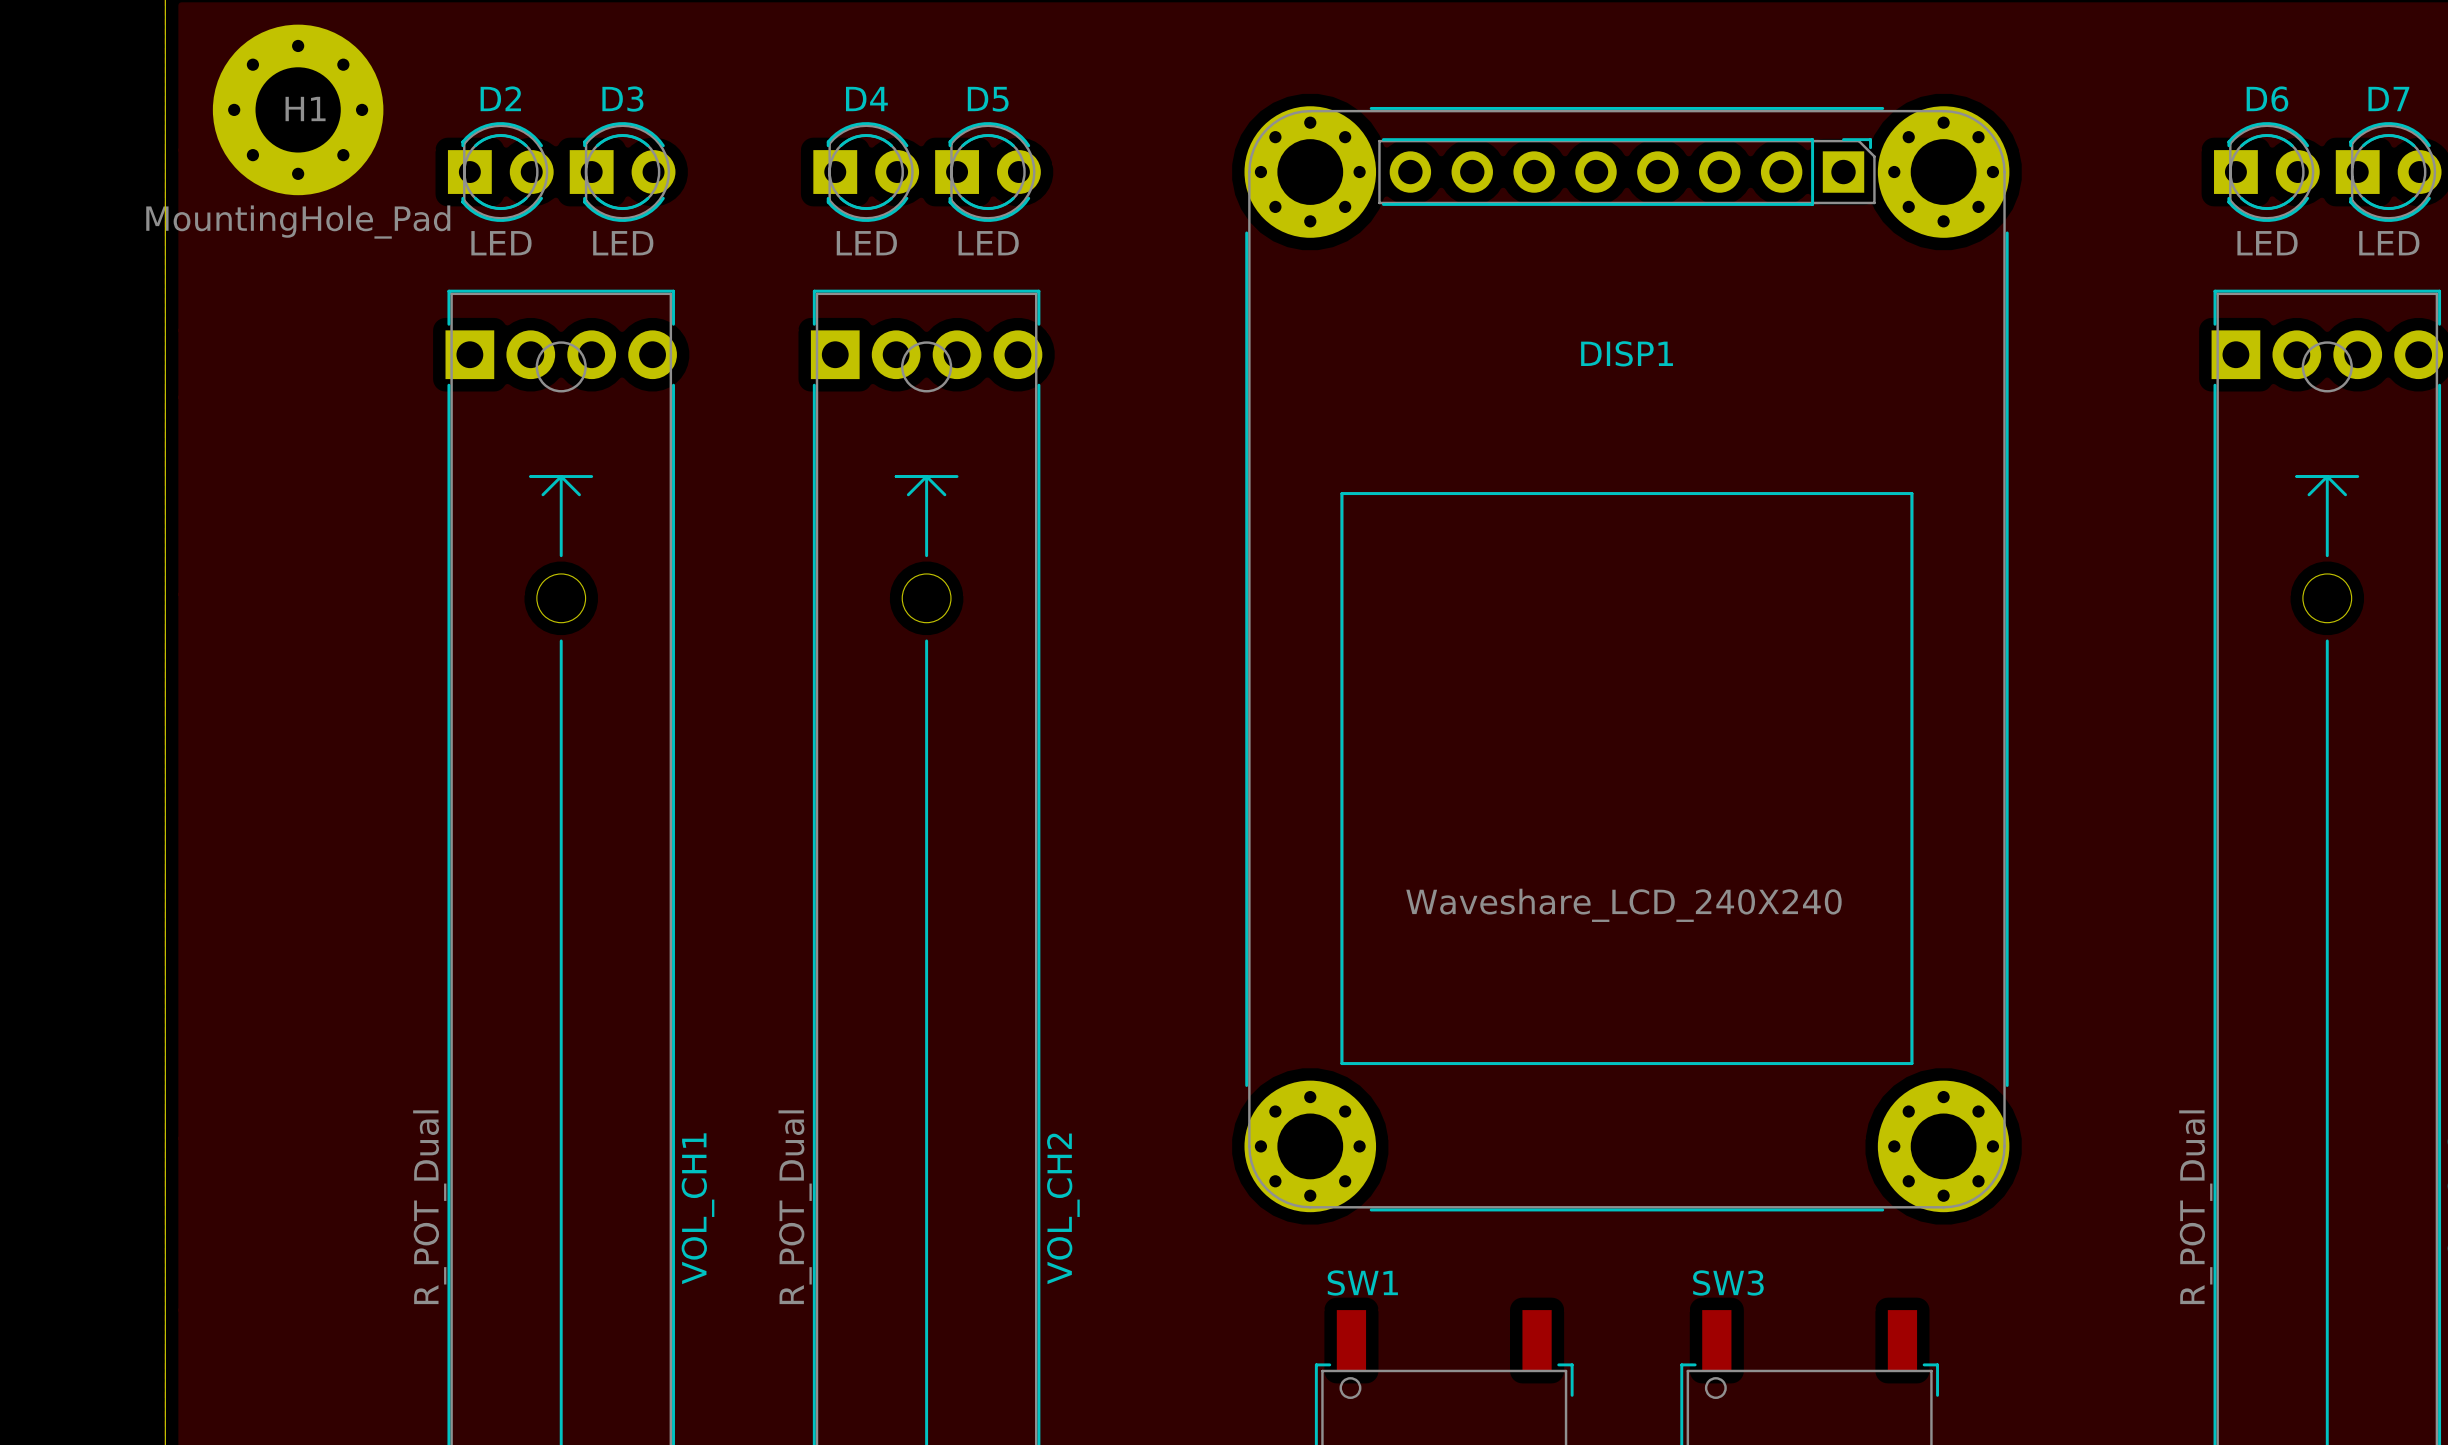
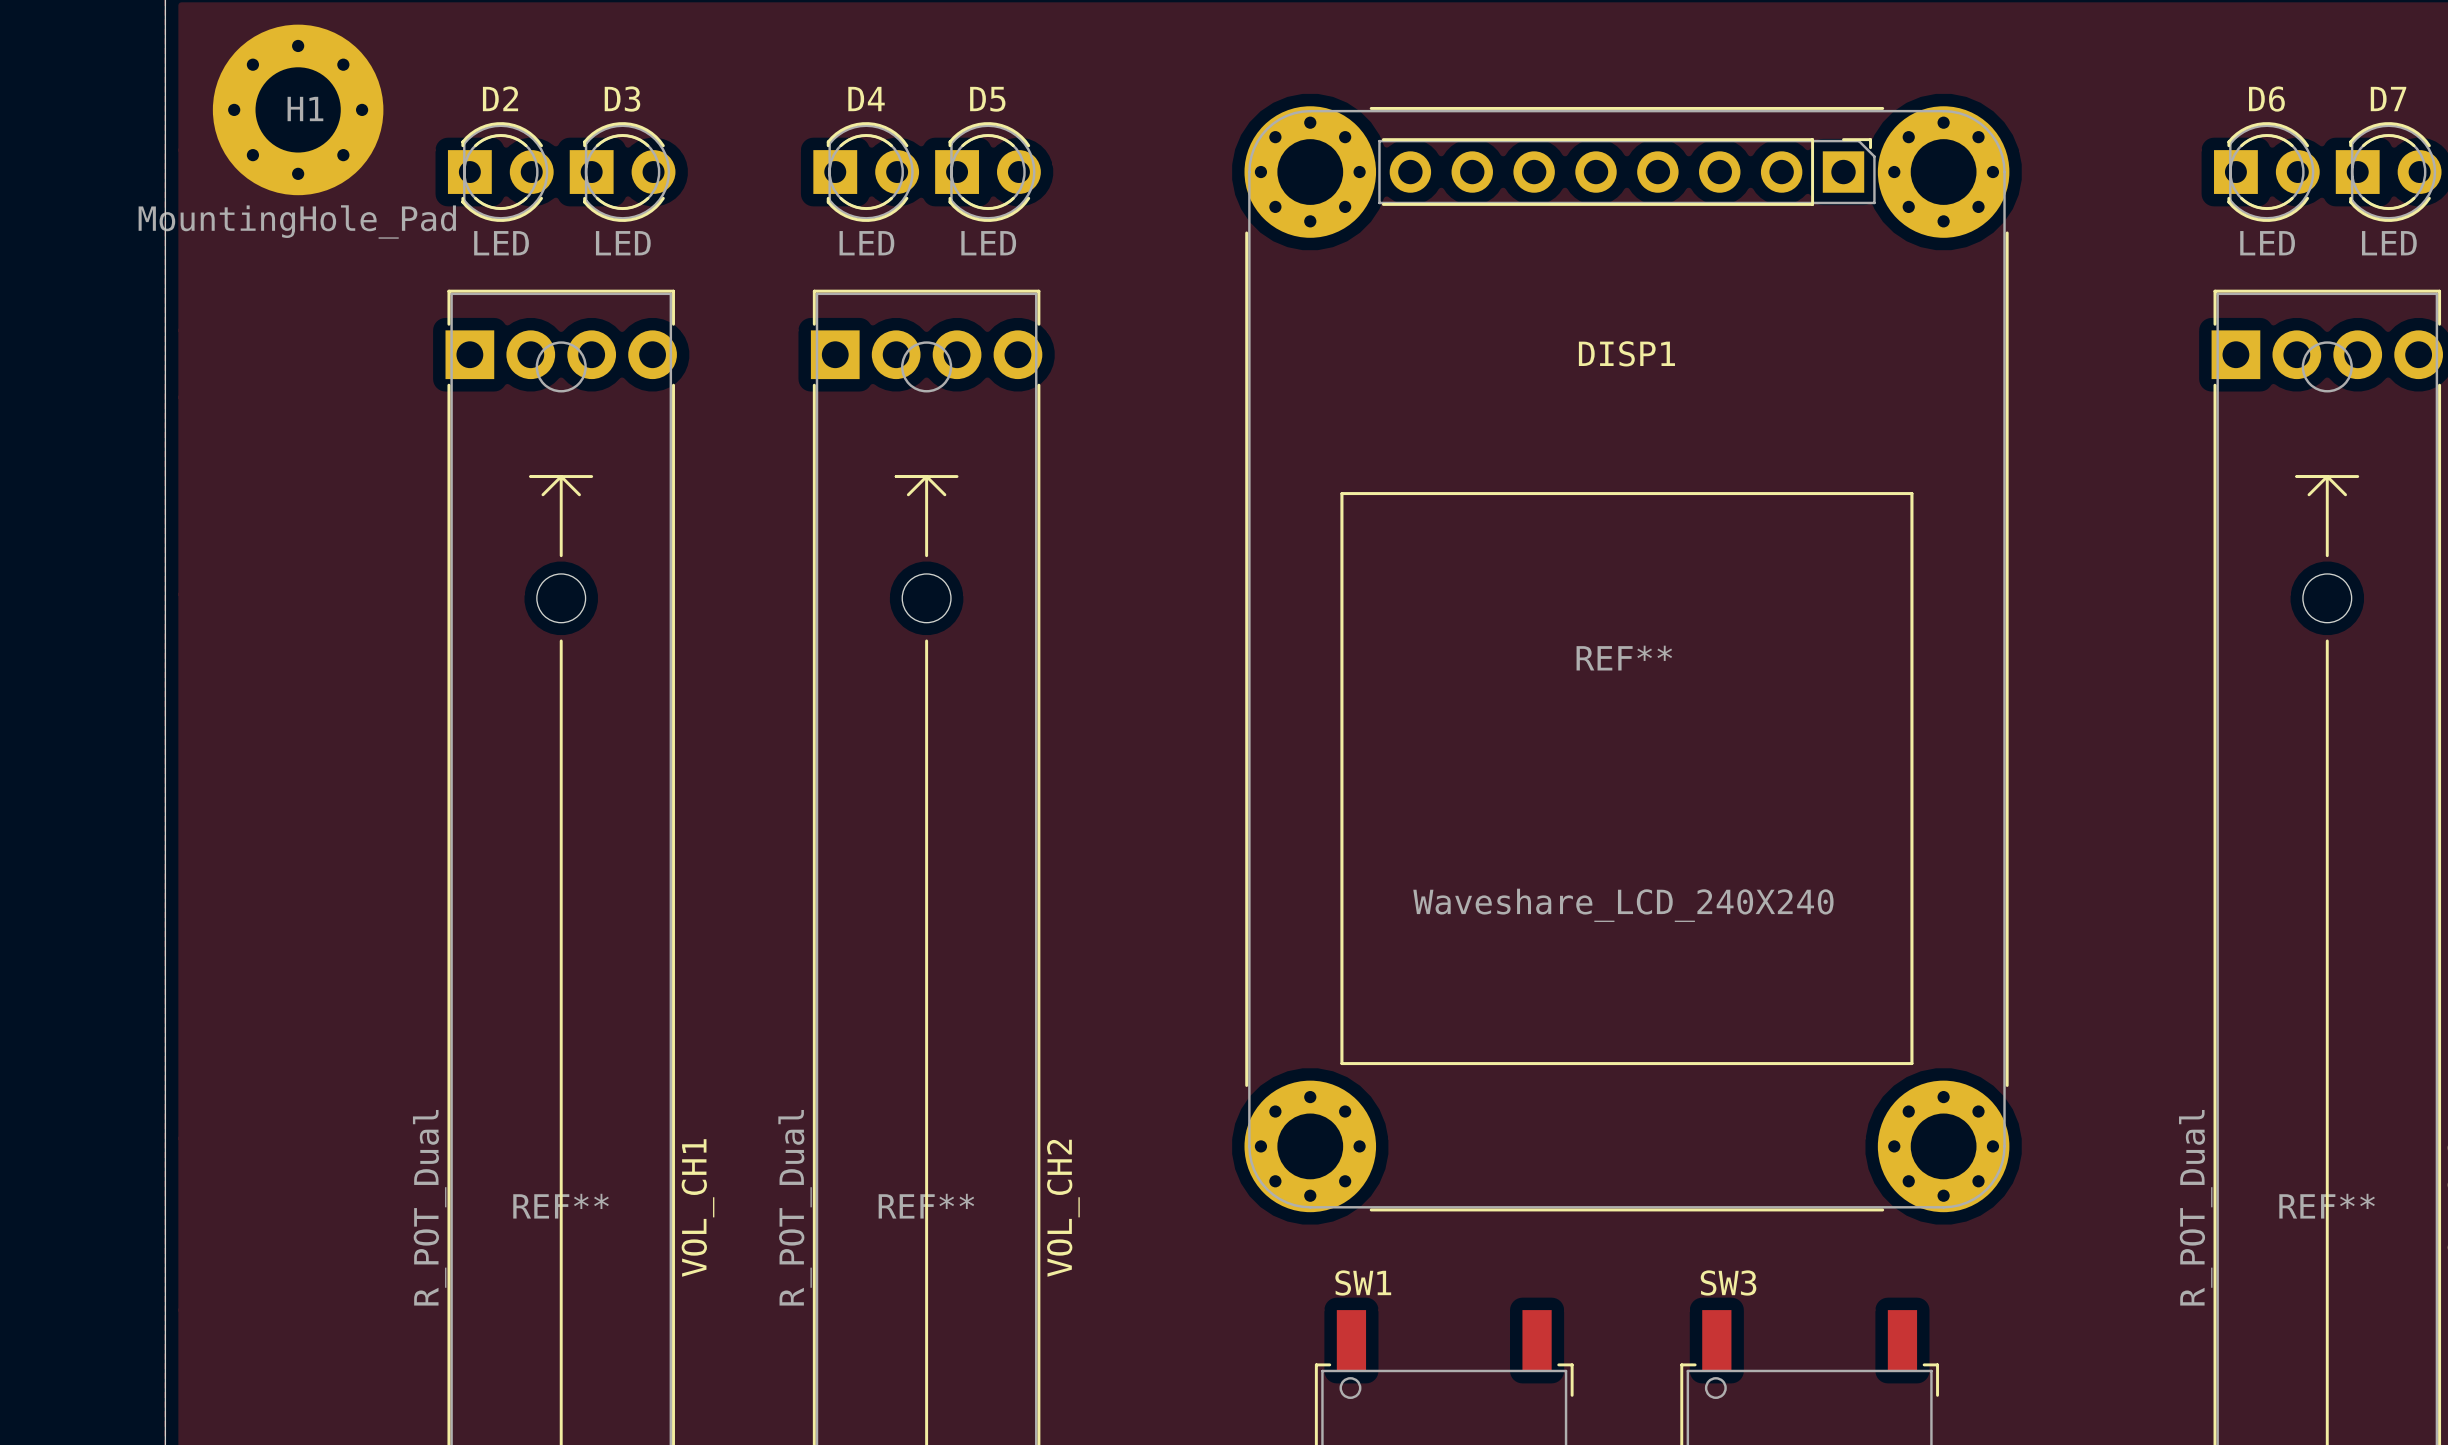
DISP1 text: none -> REF** (1624, 658)
VOL_CH1 text: none -> REF** (561, 1206)
VOL_CH2 text: none -> REF** (926, 1206)
part text: none -> REF** (2327, 1206)

